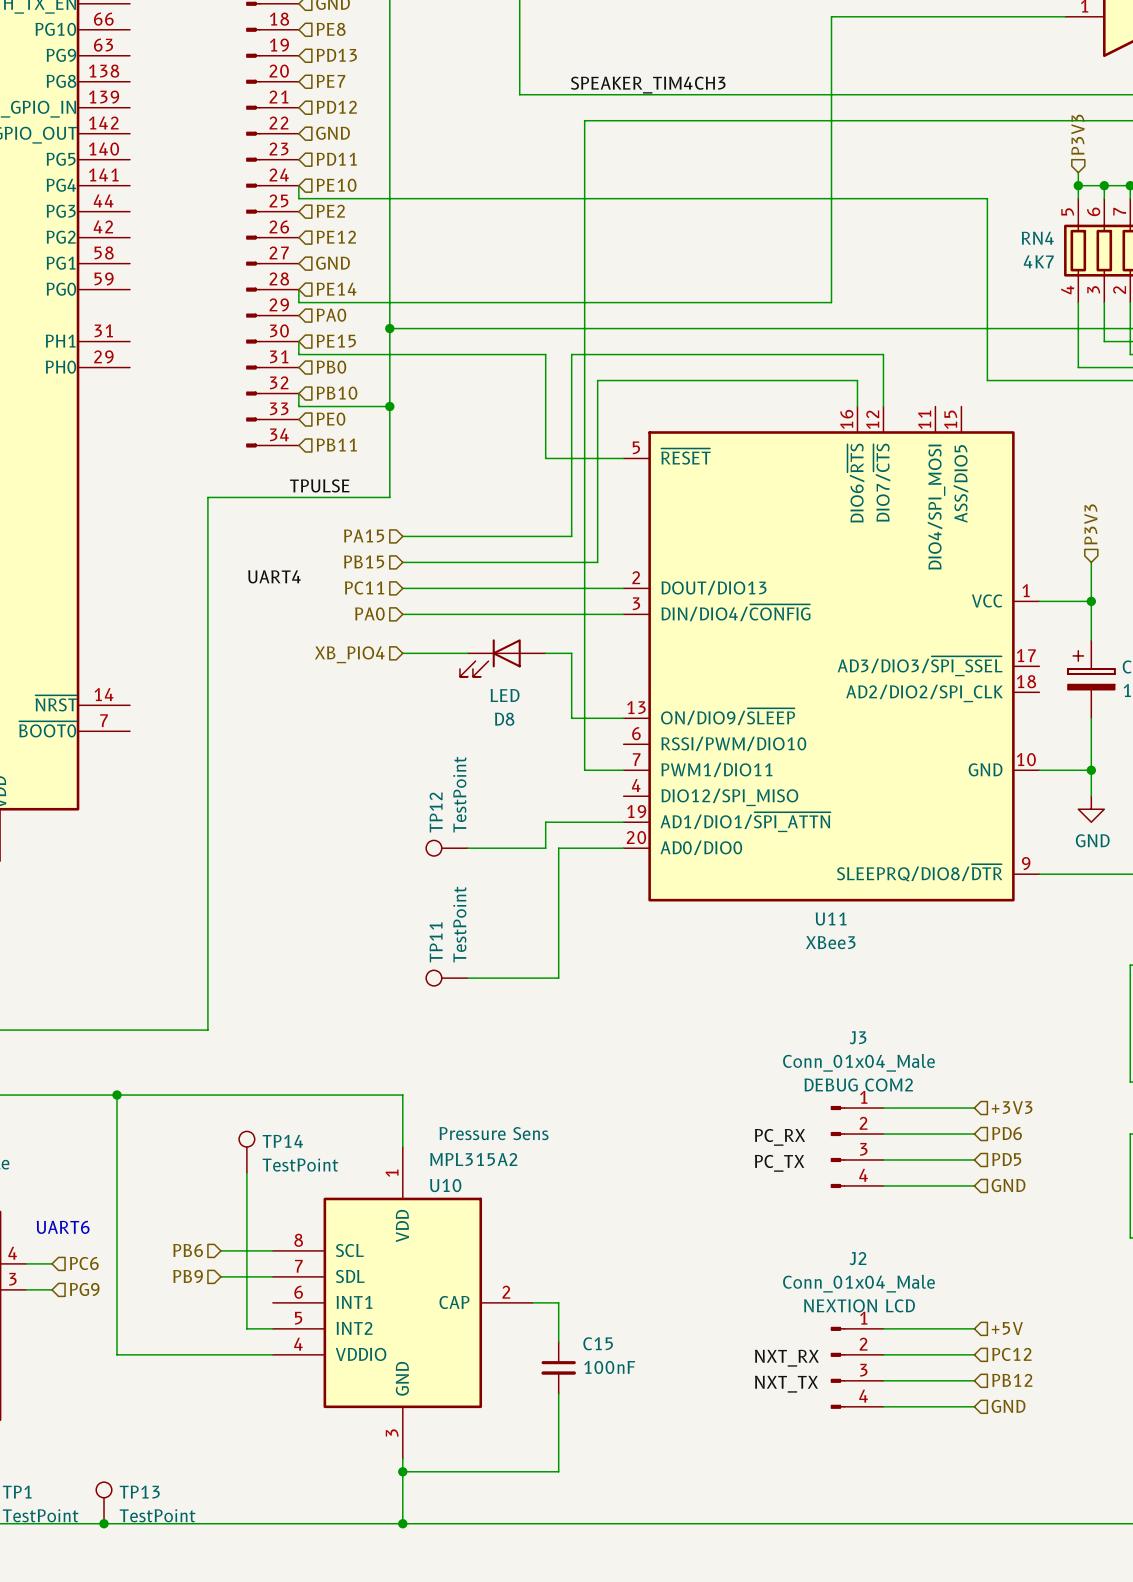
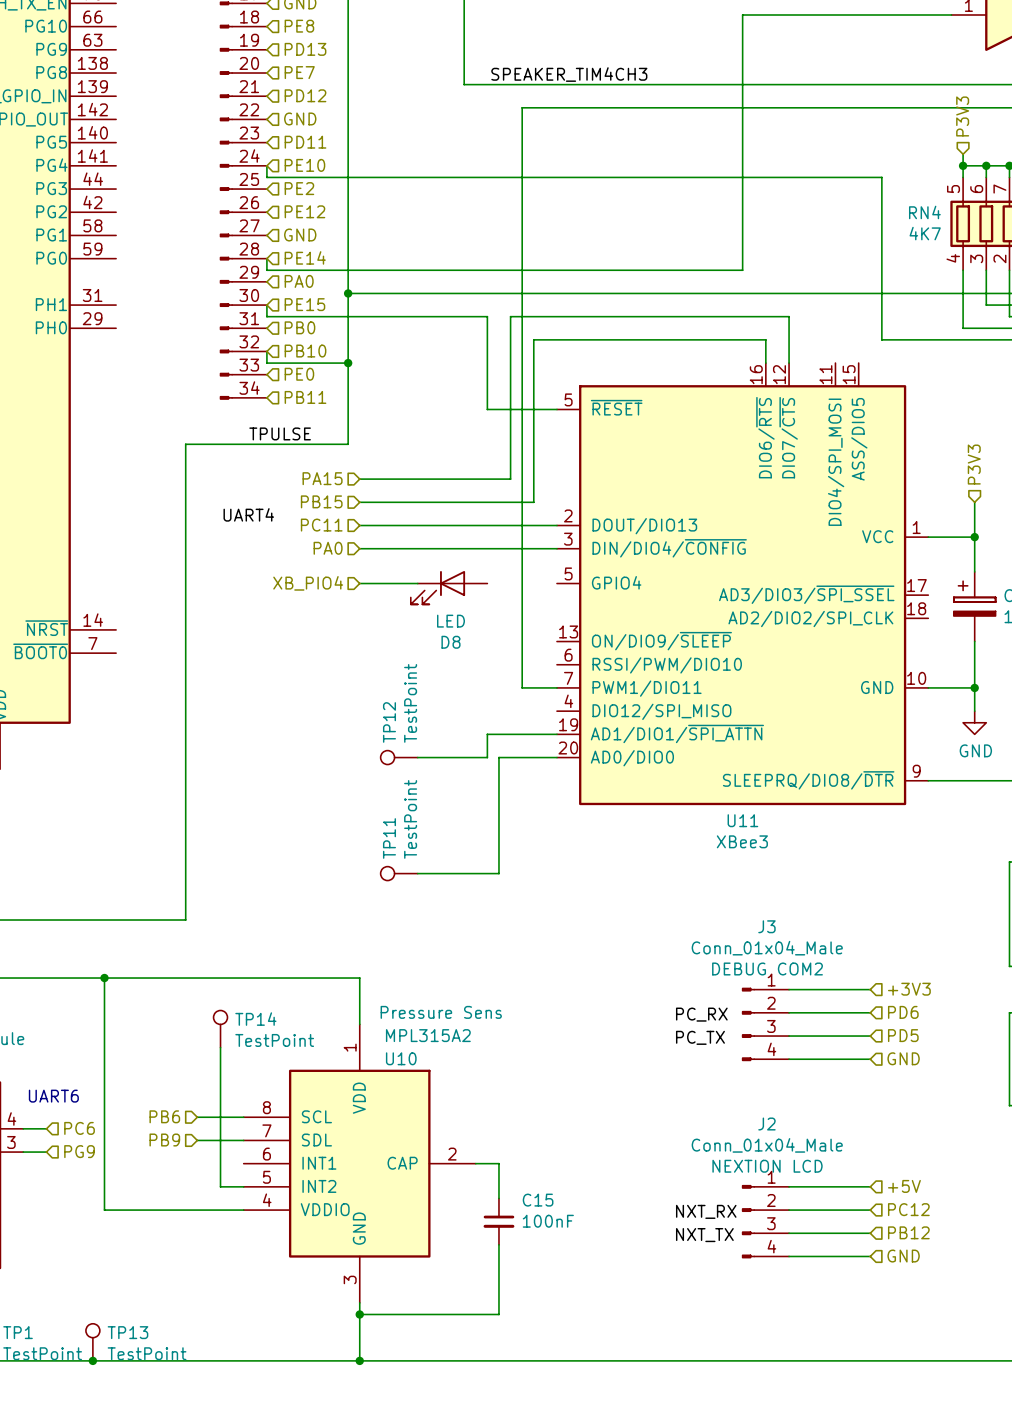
U11 symbol: [623, 406, 1040, 902] -> [556, 363, 929, 806]
wire: (545, 653) (571, 653) (571, 718) (623, 718) -> none

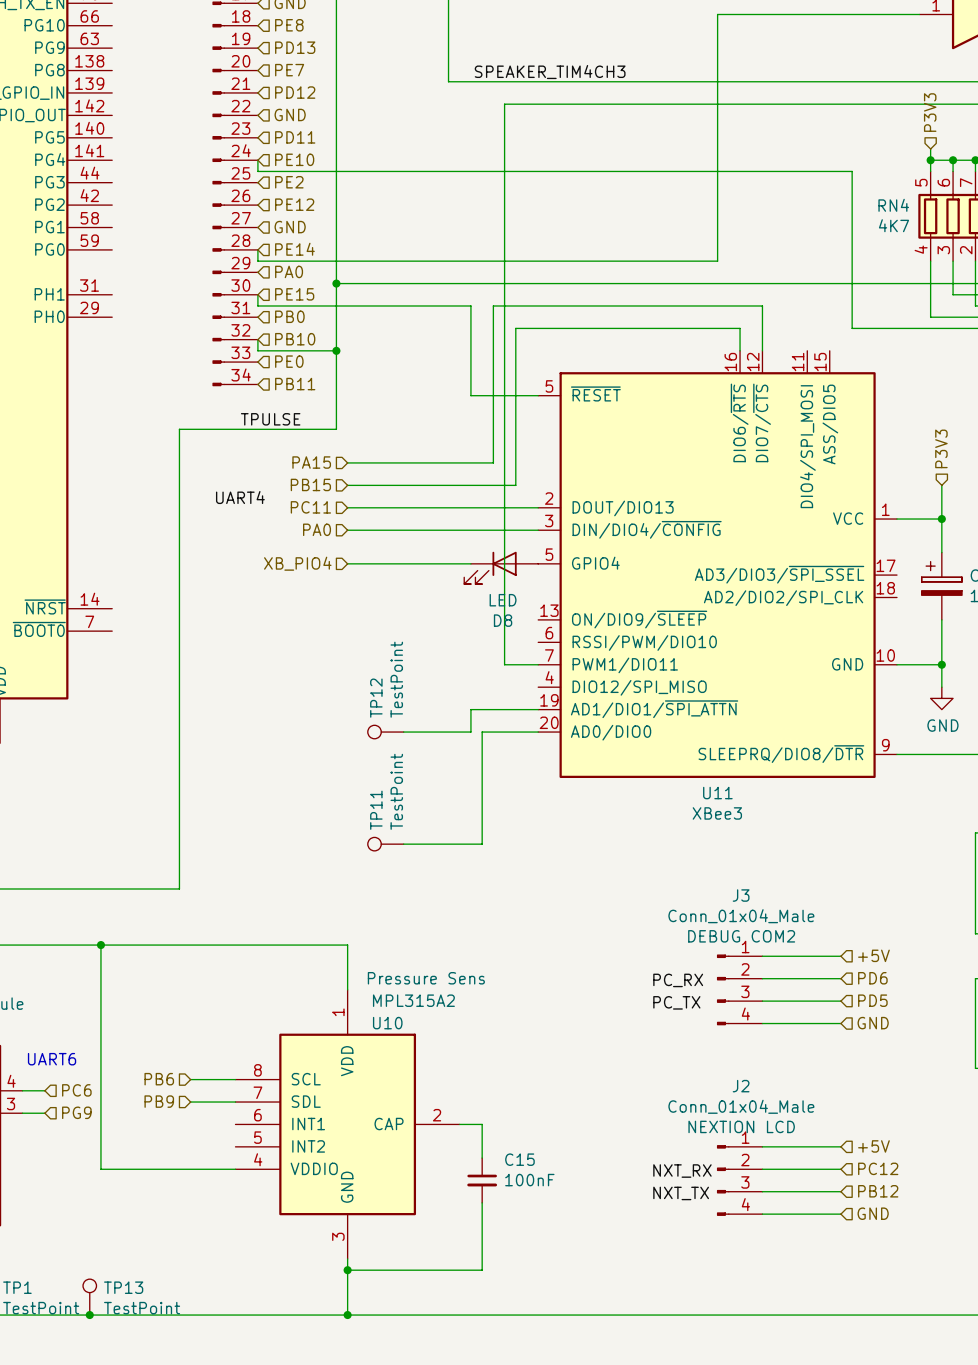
D8 position: (449, 587) -> (501, 567)
hierarchical label: +3V3 (909, 989) -> +5V (873, 955)
TP14: TestPoint (220, 1029) -> none
wire: (220, 1047) (220, 1186) (243, 1186) -> none

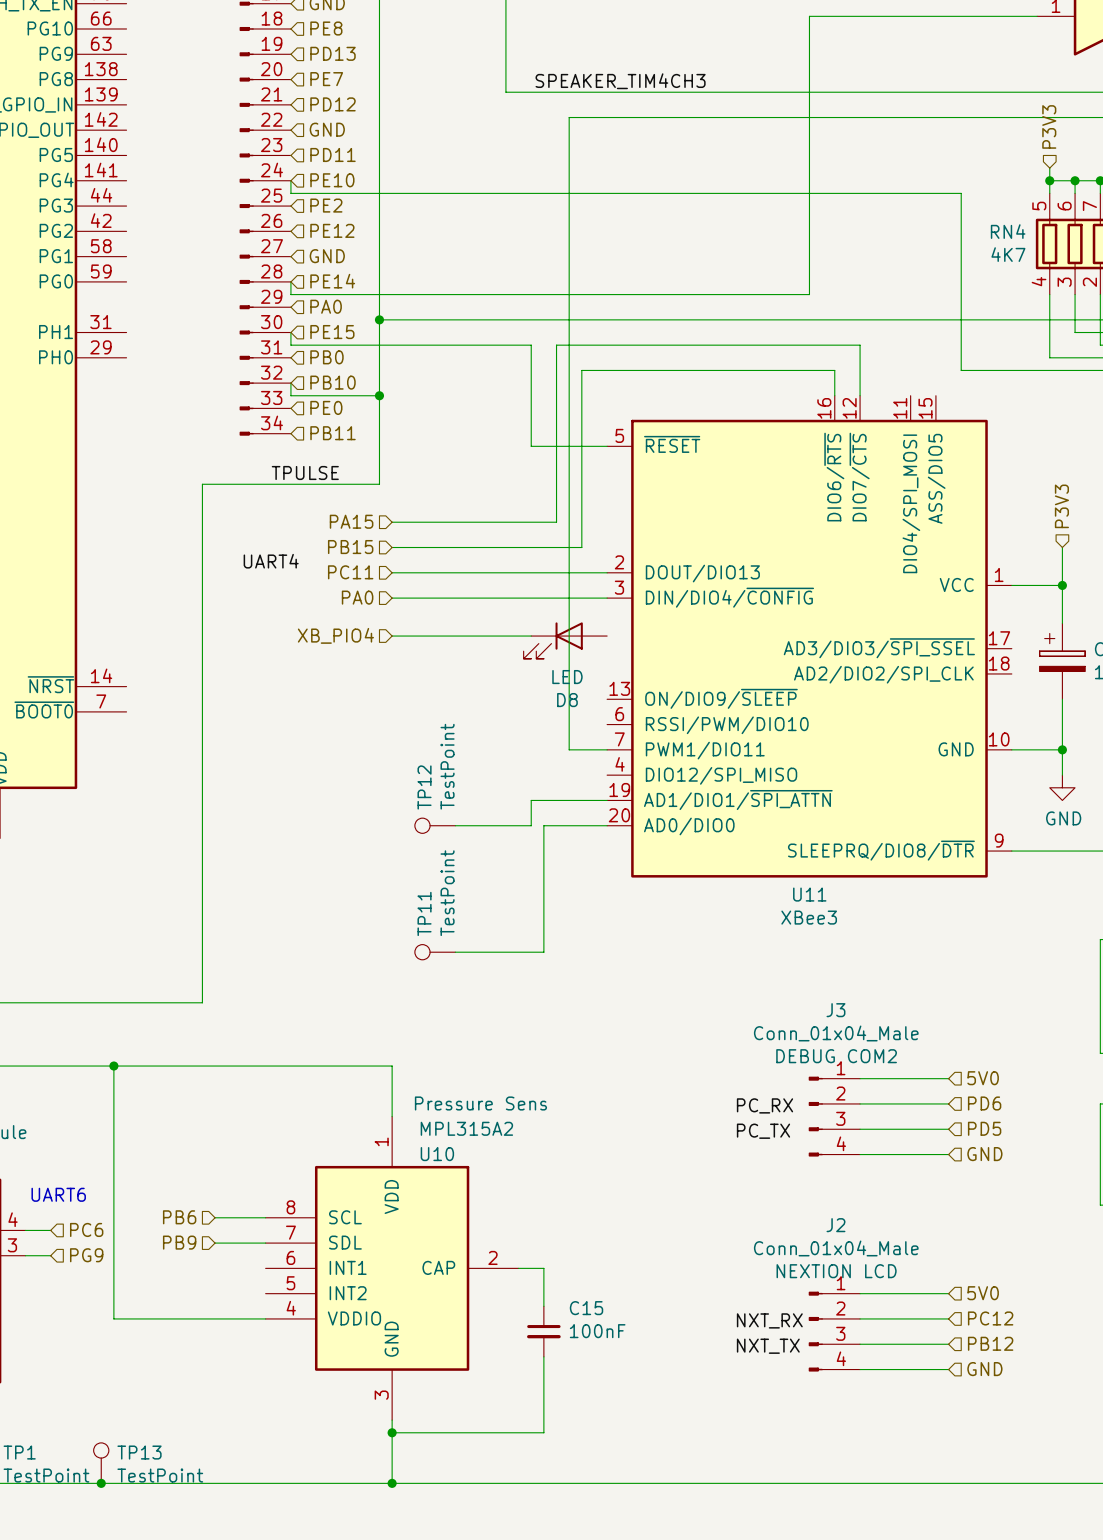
U11 symbol: [538, 350, 897, 779] -> [607, 395, 1012, 878]
hierarchical label: +5V (873, 955) -> 5V0 (983, 1078)
hierarchical label: +5V (873, 1146) -> 5V0 (983, 1293)

